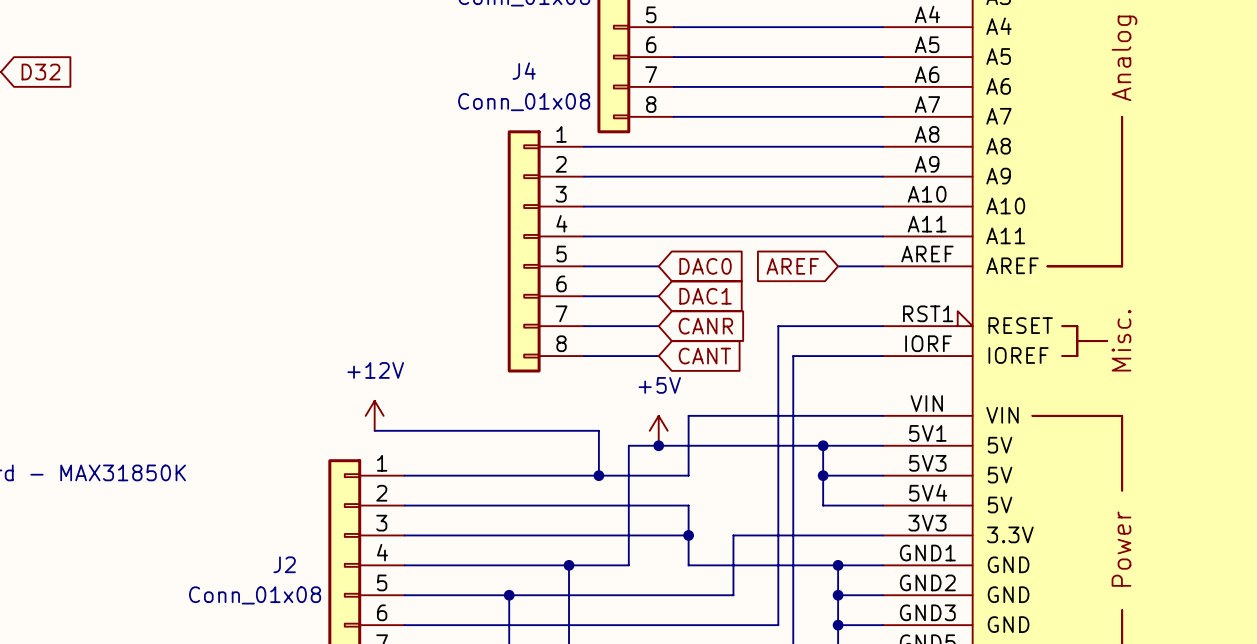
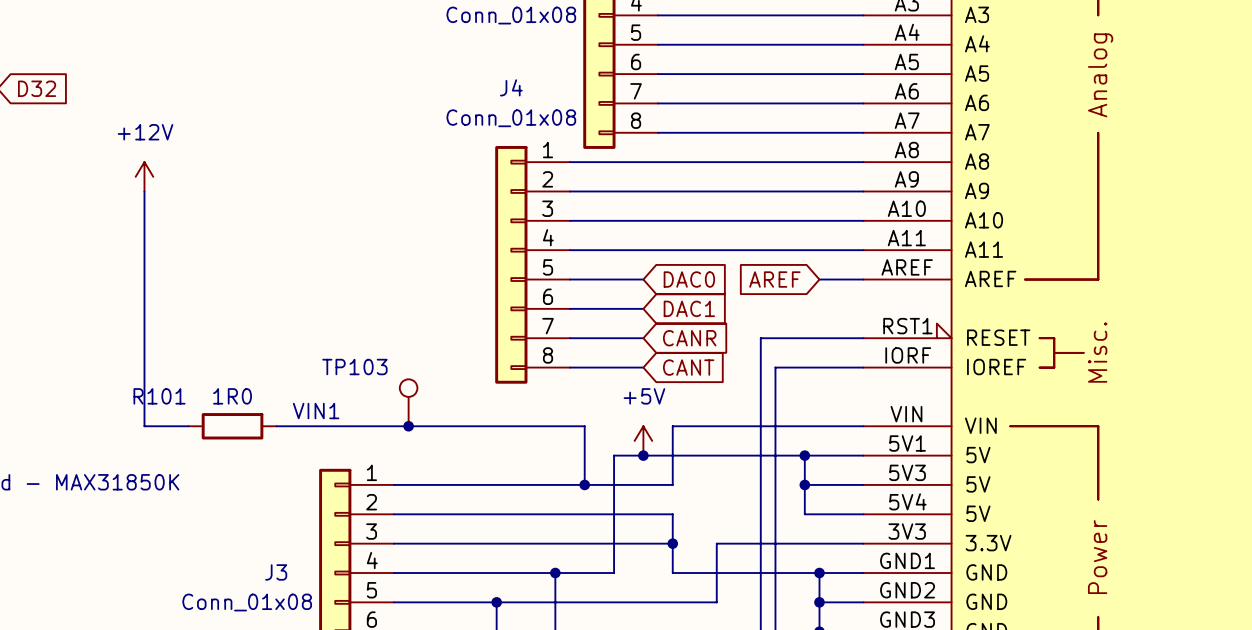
power symbol: none -> +12V (144, 176)
wire: none -> (144, 191) (144, 426) (188, 426)
TP103: none -> VIN1 (408, 402)
R101: none -> 1R0 (232, 426)
power symbol: +12V (374, 415) -> none
junction: none -> (408, 426)
wire: (374, 430) (598, 430) -> (276, 426) (584, 426) (584, 440)
J2 name: J2 (284, 564) -> J3 (276, 572)

